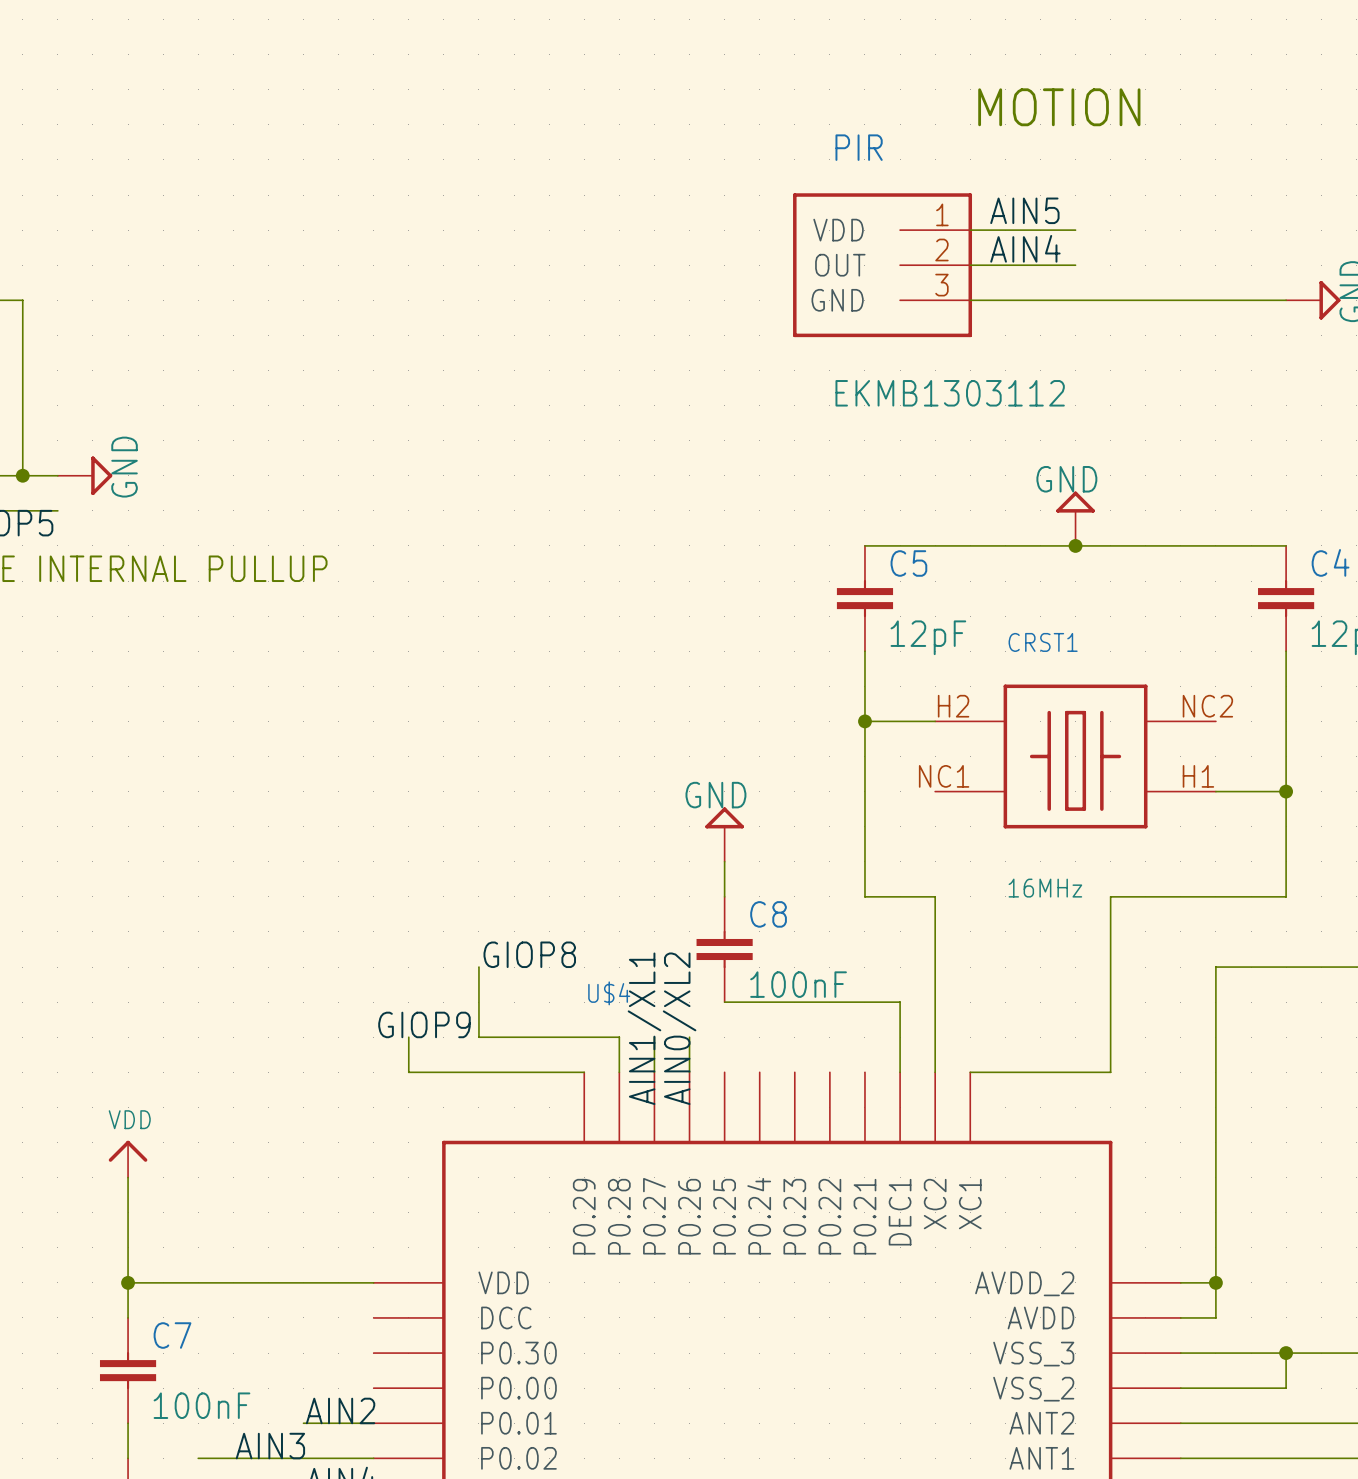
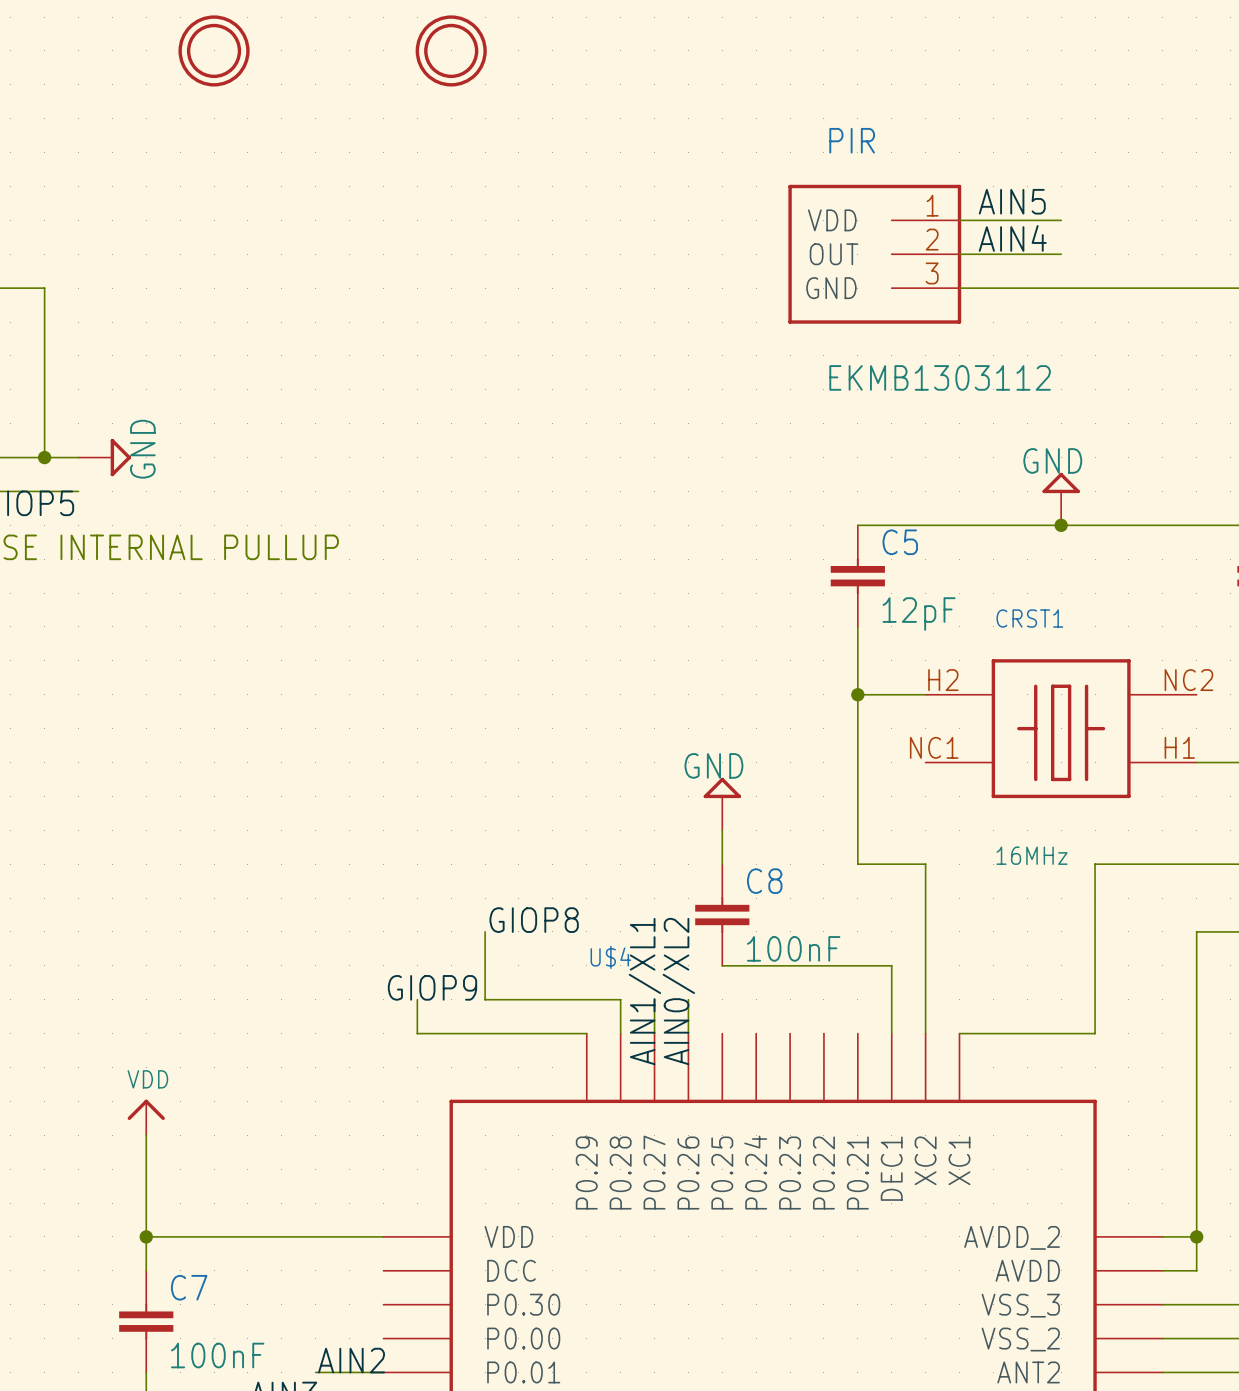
part: none -> (214, 50)
part: none -> (451, 50)
text: MOTION (1059, 107) -> none

